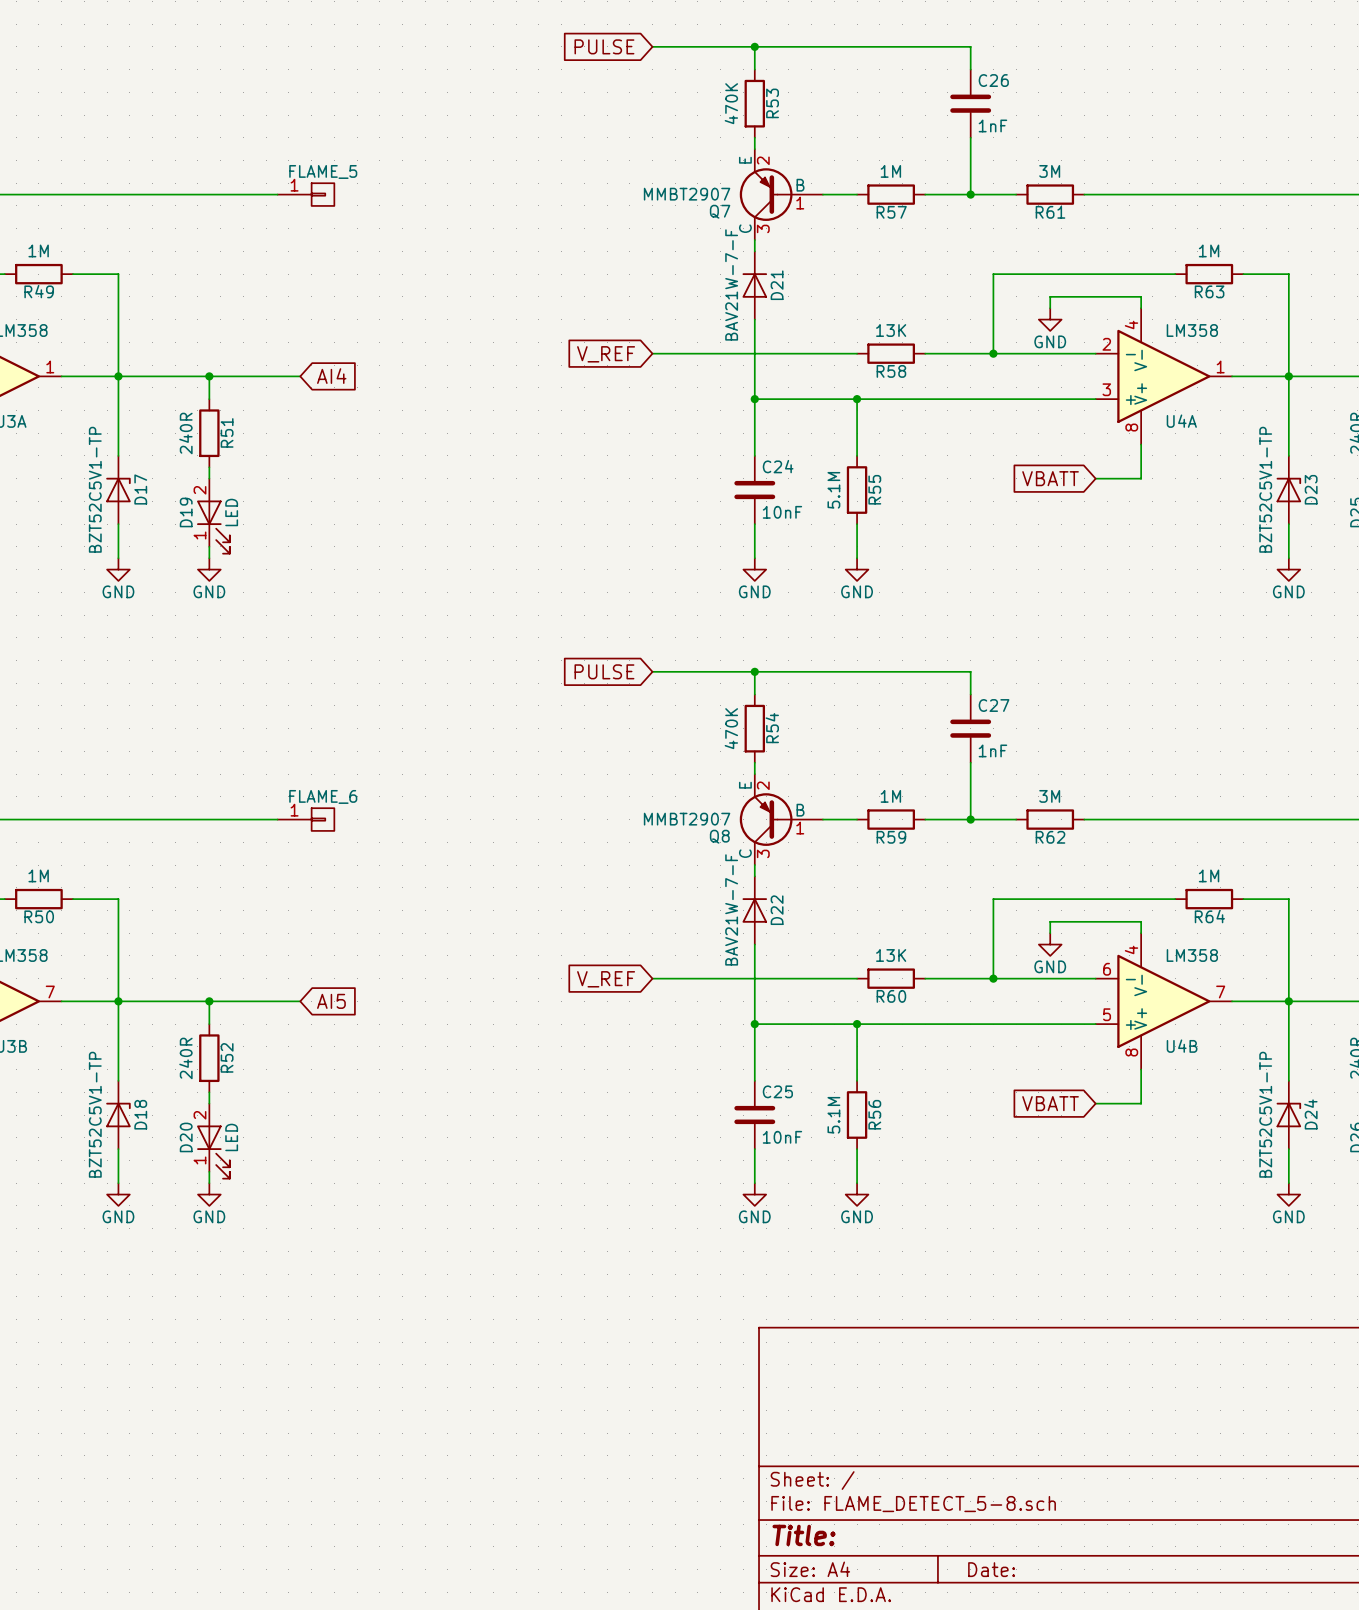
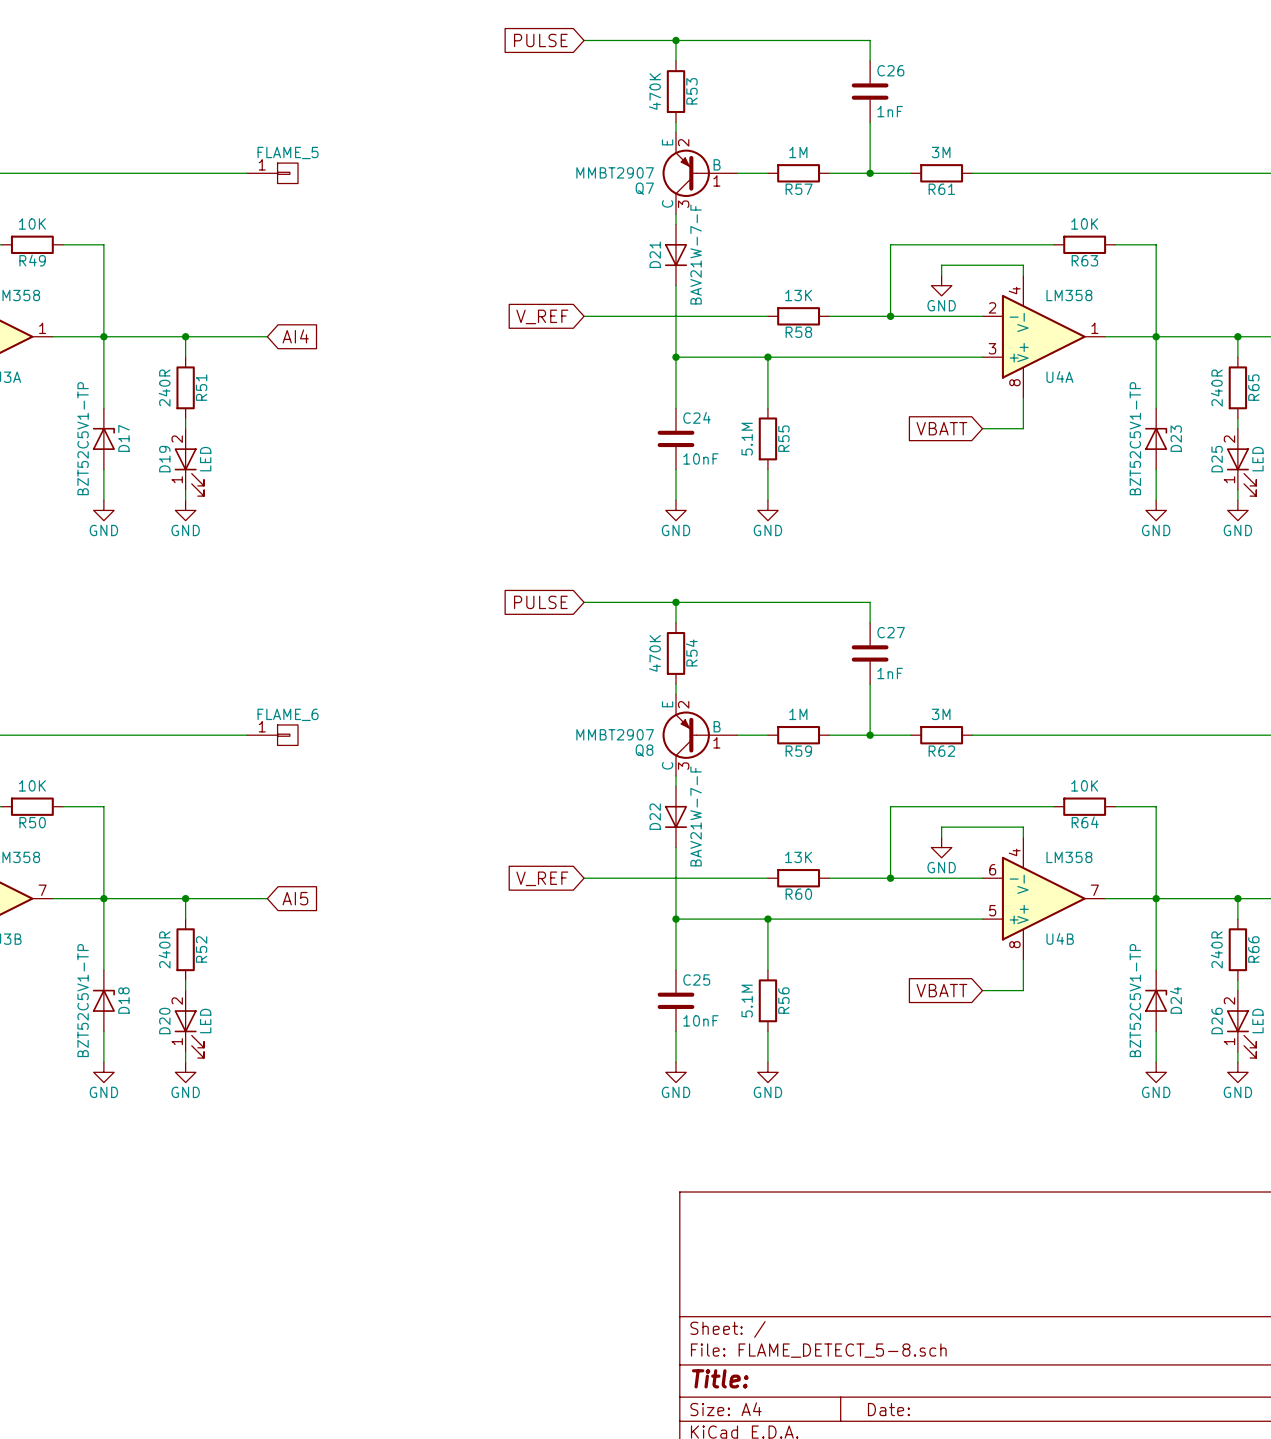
R49 value: 1M (38, 250) -> 10K (32, 223)
R63 value: 1M (1209, 250) -> 10K (1084, 223)
D21 rotation: 0° (754, 285) -> 180° (676, 255)
R50 value: 1M (38, 875) -> 10K (32, 785)
R64 value: 1M (1209, 875) -> 10K (1084, 785)
D22 rotation: 0° (754, 910) -> 180° (676, 816)

